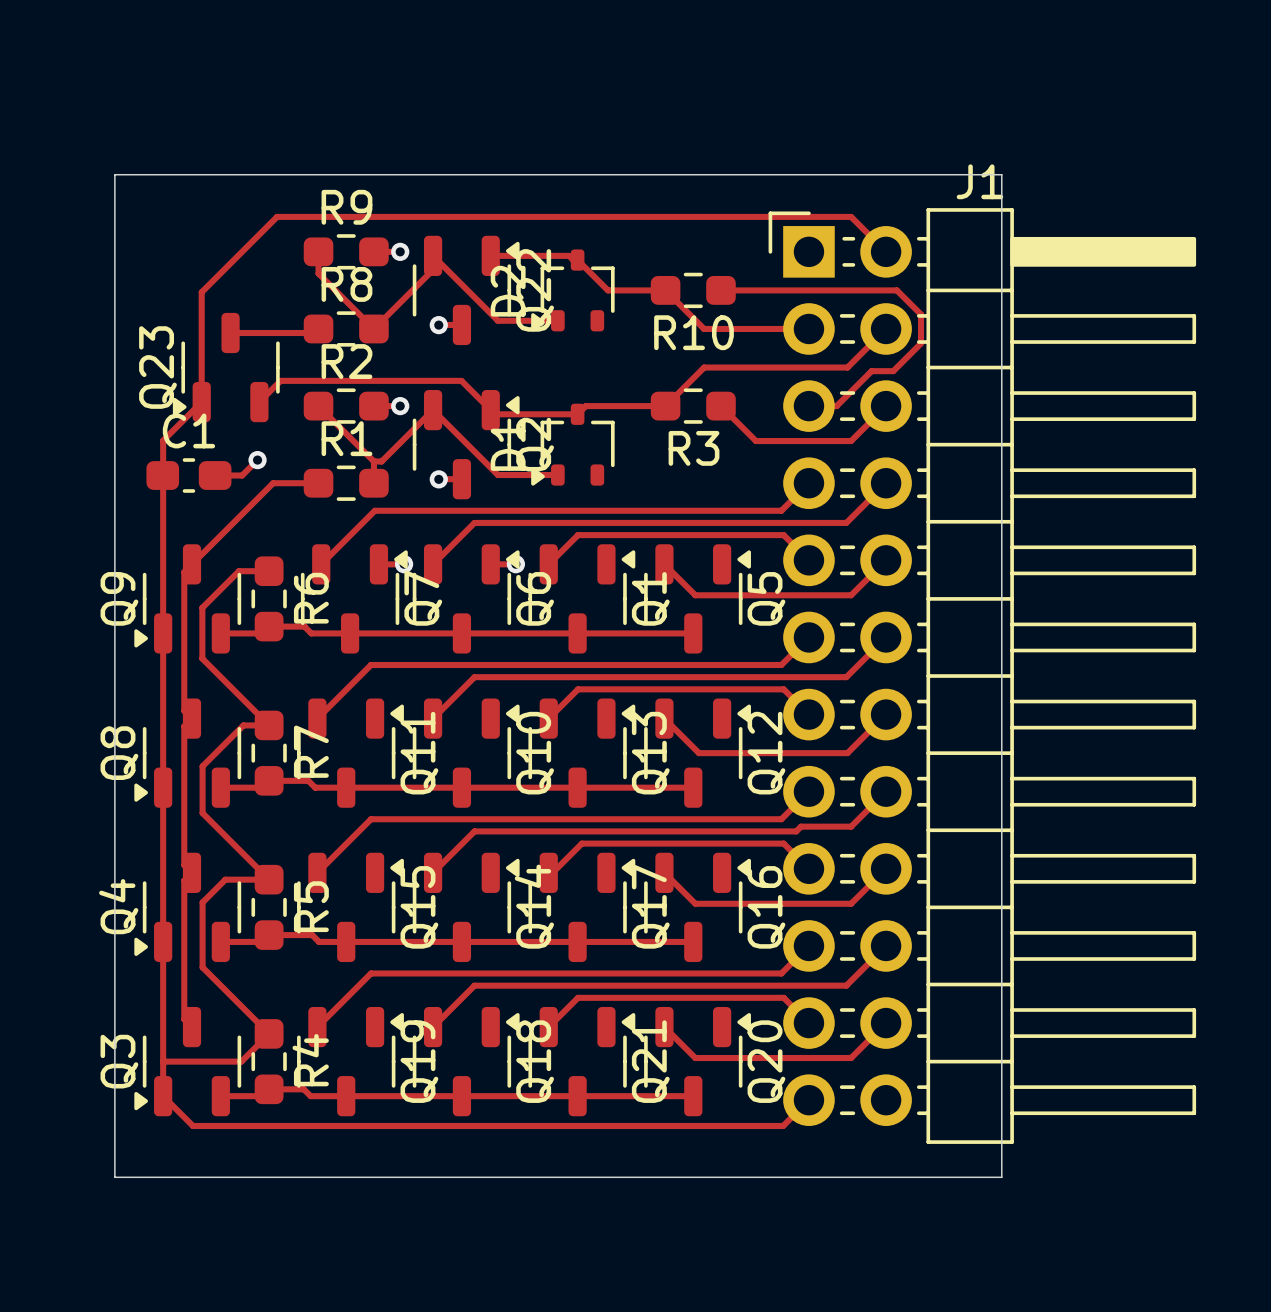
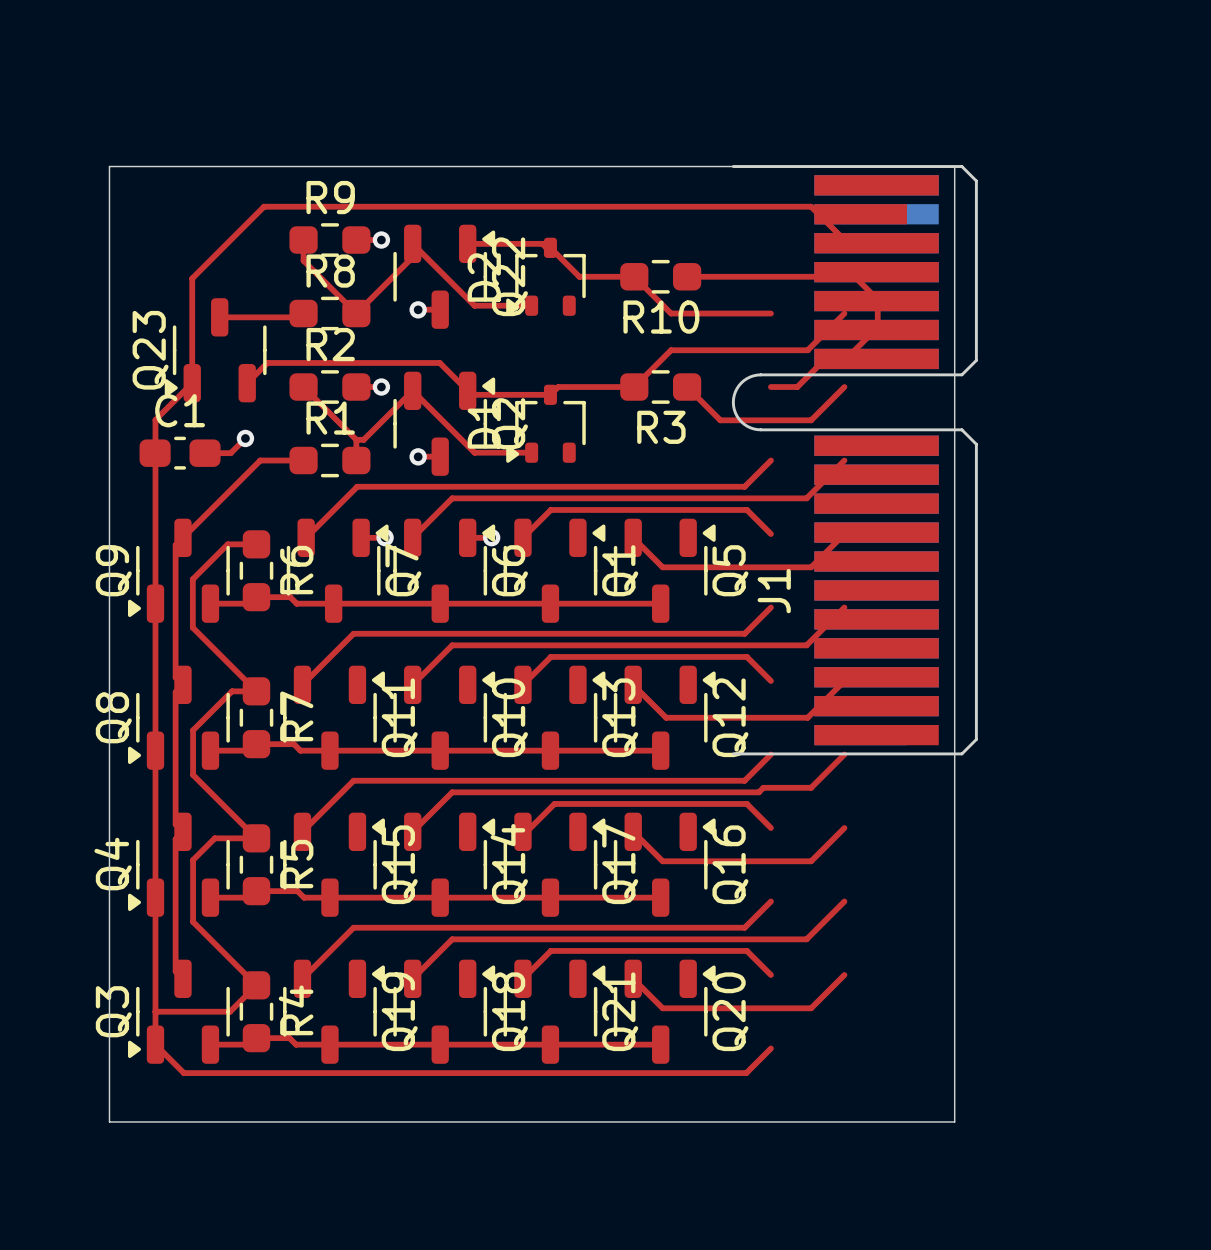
J1 name position: J1 (979, 181) -> J1 (774, 591)
J1 footprint: [768, 208, 1197, 1144] -> [731, 165, 978, 756]

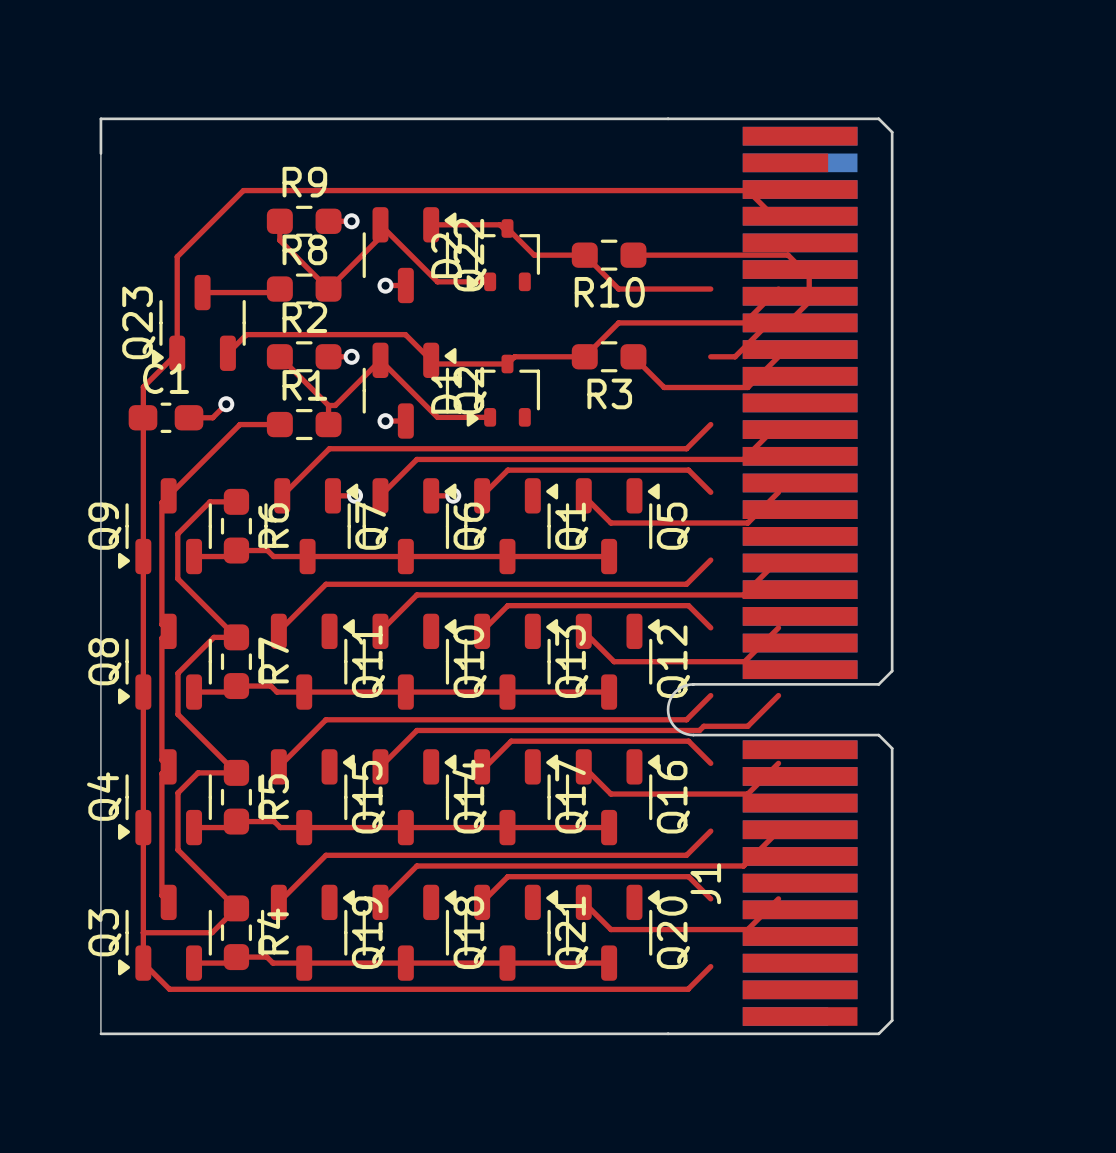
board edge: none -> (668, 118) (100, 118) (100, 153)
J1 footprint: [731, 165, 978, 756] -> [666, 117, 894, 1036]
board edge: (109, 166) (954, 166) (954, 1121) (109, 1121) -> (668, 1033) (100, 1033)
J1 name position: J1 (774, 591) -> J1 (705, 883)

